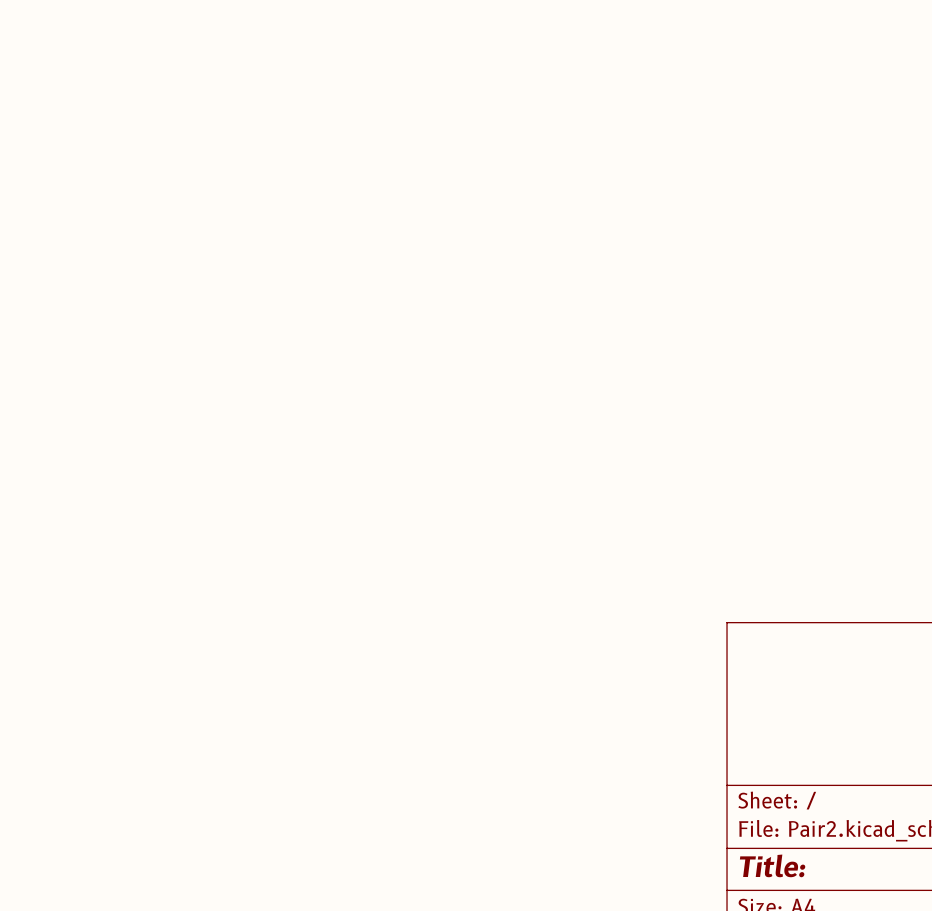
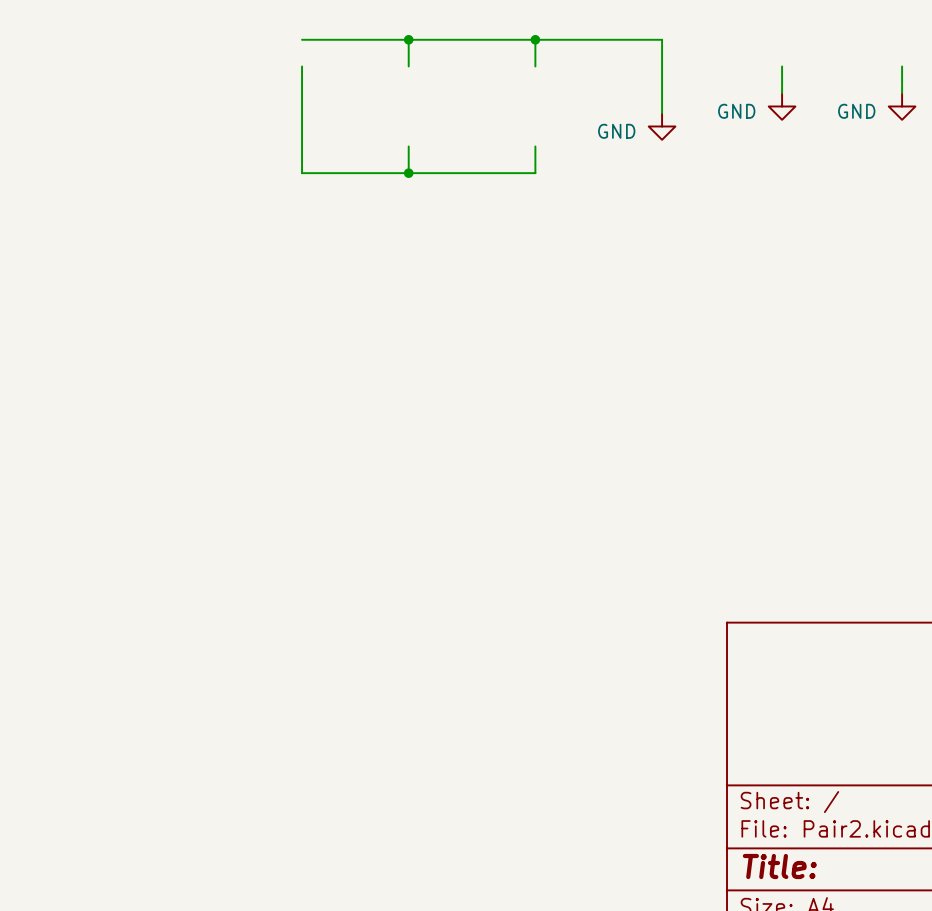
wire: none -> (302, 39) (662, 39) (662, 113)
wire: none -> (408, 39) (408, 66)
junction: none -> (408, 39)
wire: none -> (535, 39) (535, 66)
junction: none -> (535, 39)
wire: none -> (302, 66) (302, 173) (535, 173) (535, 146)
wire: none -> (782, 66) (782, 93)
wire: none -> (902, 66) (902, 93)
power symbol: none -> GND (782, 106)
power symbol: none -> GND (902, 106)
power symbol: none -> GND (662, 126)
wire: none -> (408, 146) (408, 173)
junction: none -> (408, 173)

